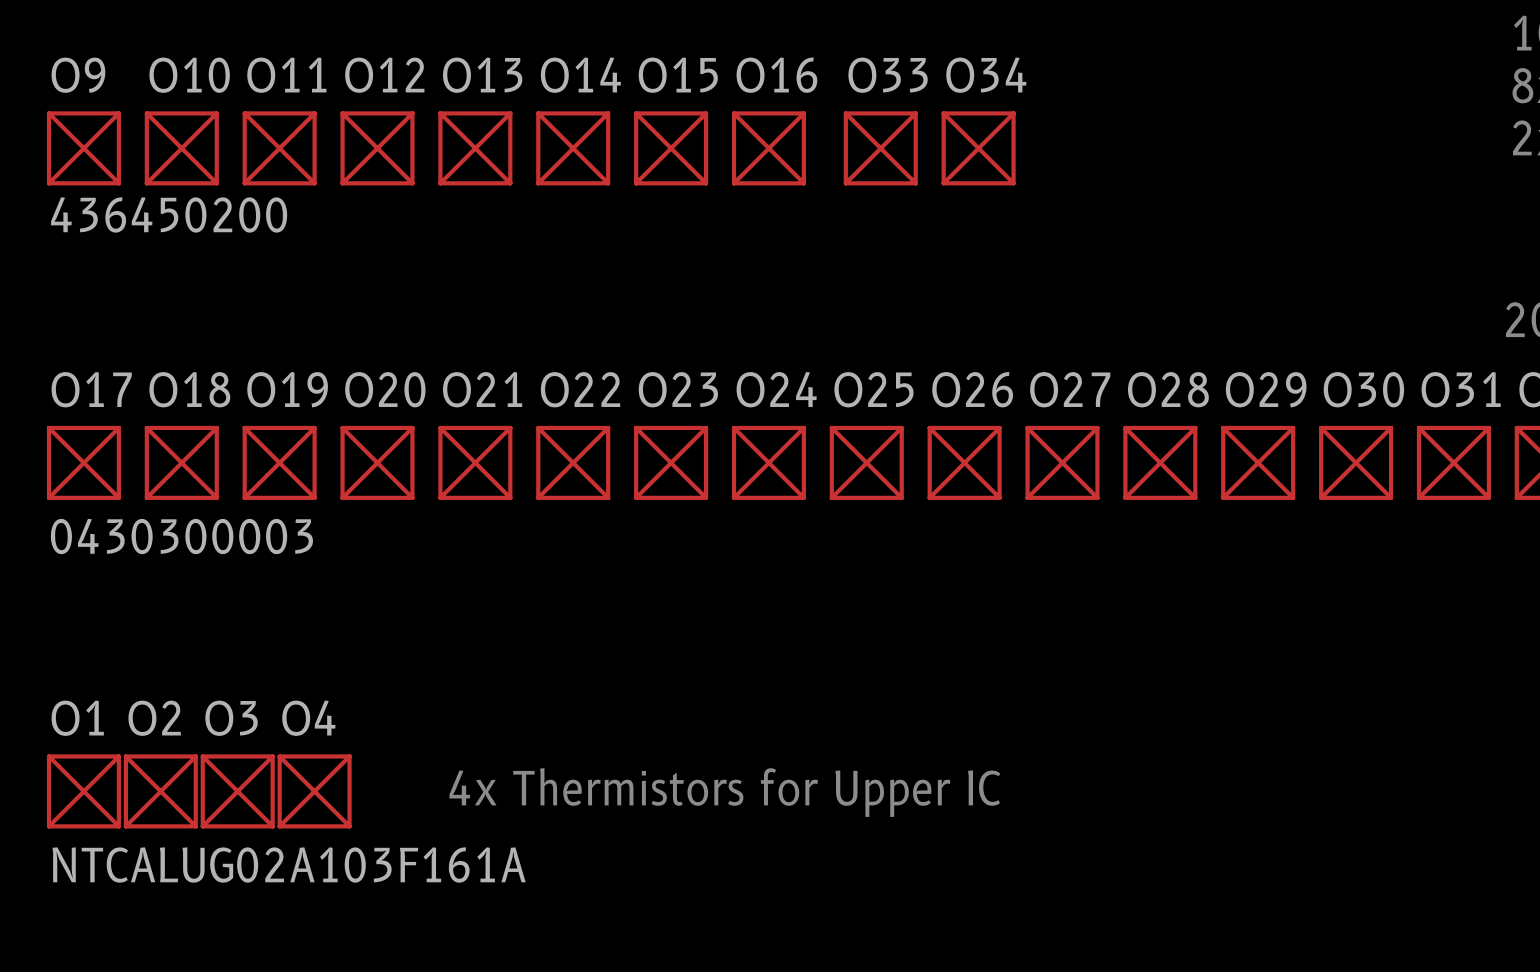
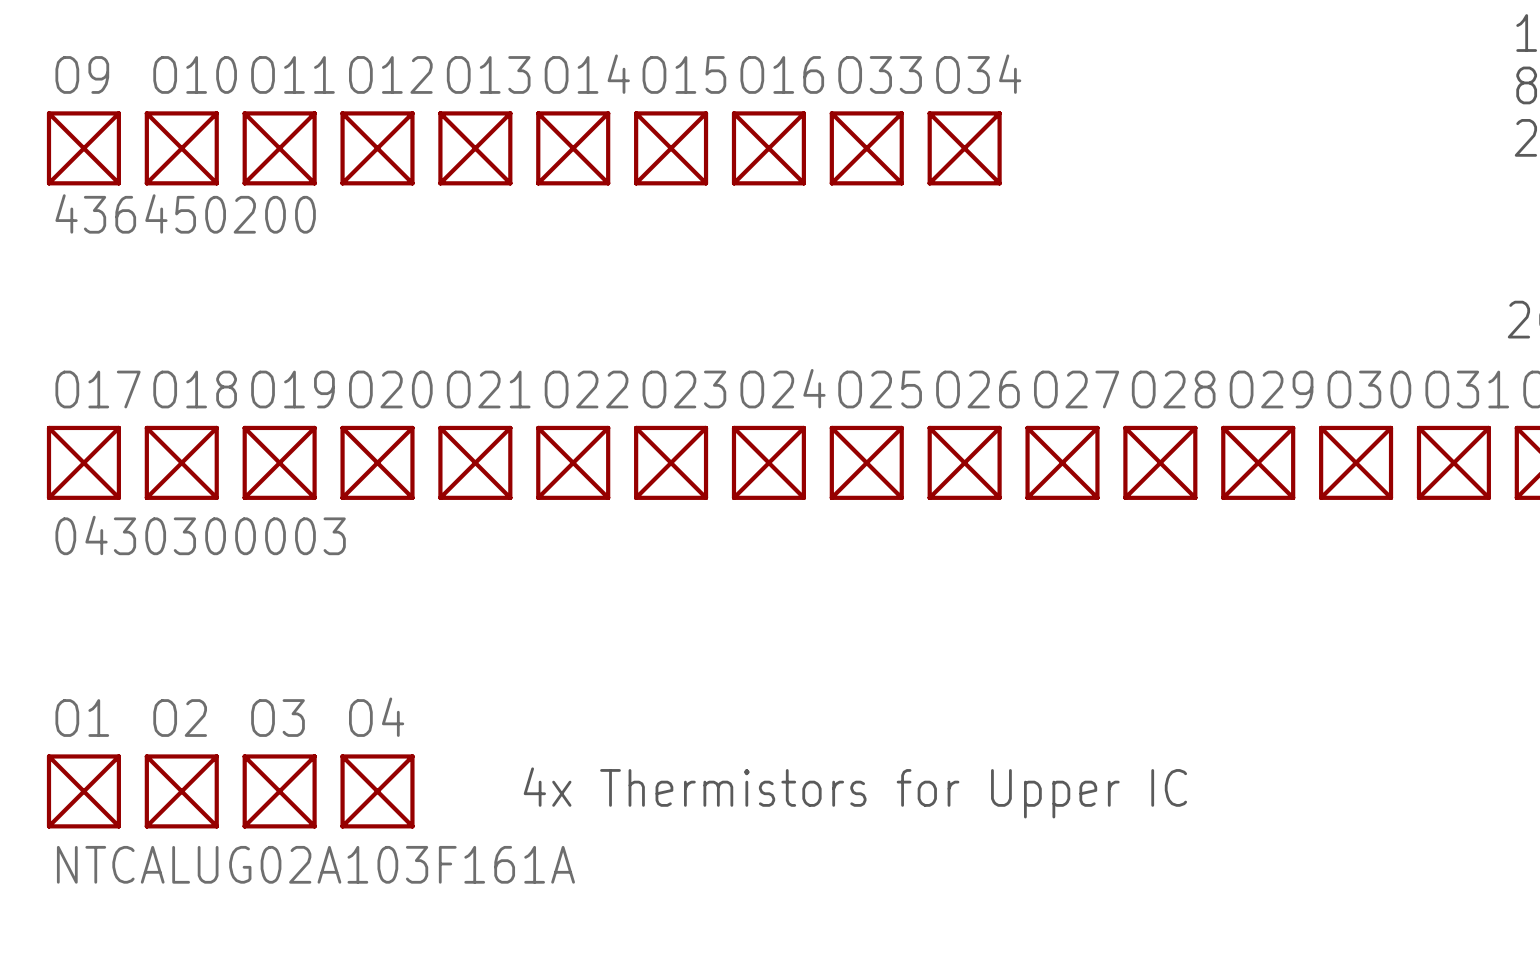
O33 position: (880, 148) -> (866, 148)
O34 position: (978, 148) -> (964, 148)
O2 position: (160, 791) -> (181, 791)
O3 position: (237, 791) -> (279, 791)
O4 position: (314, 791) -> (377, 791)
text position: 4x Thermistors for Upper IC (724, 792) -> 4x Thermistors for Upper IC (855, 792)

